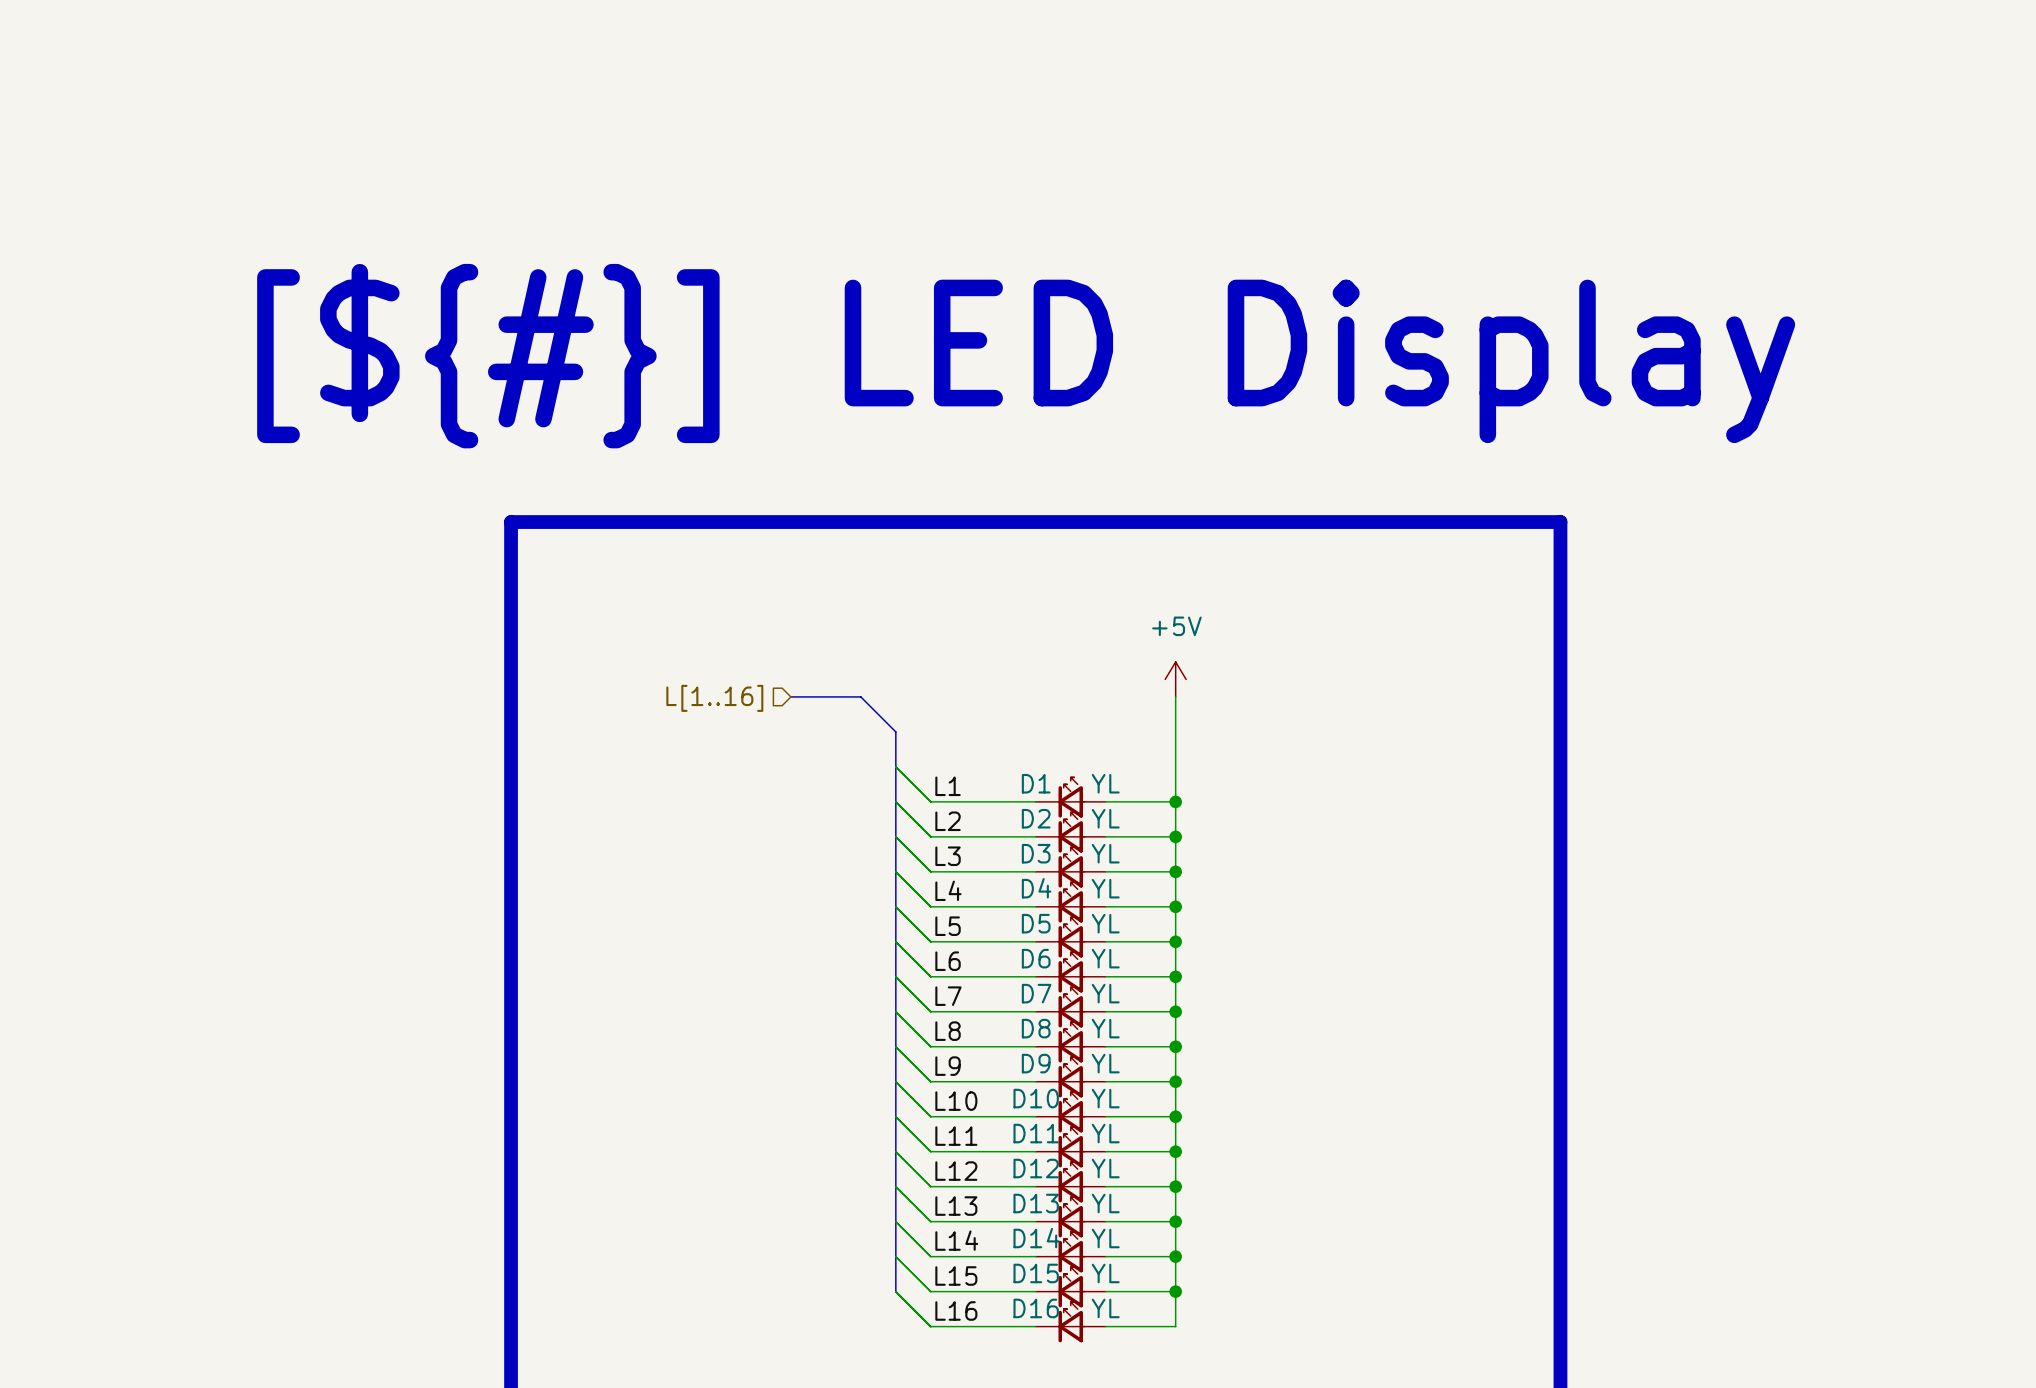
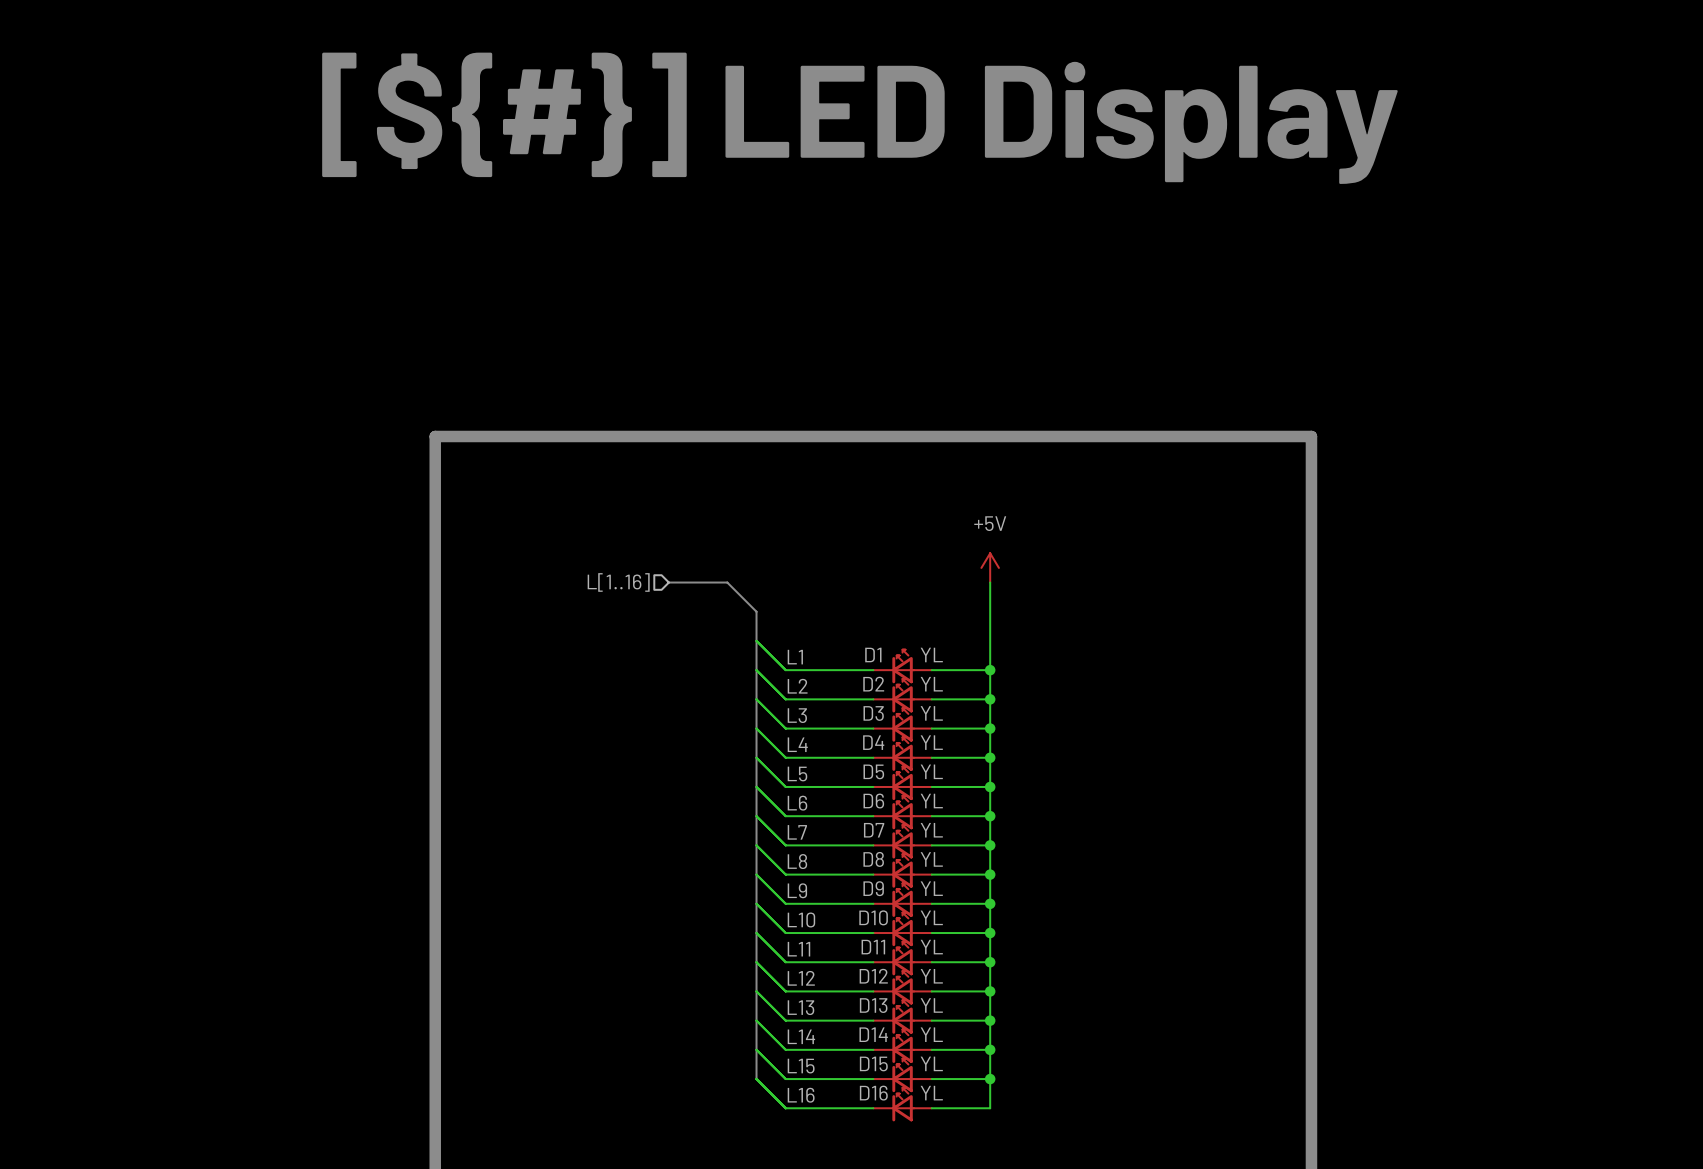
text position: [${#}] LED Display (1026, 356) -> [${#}] LED Display (859, 118)

